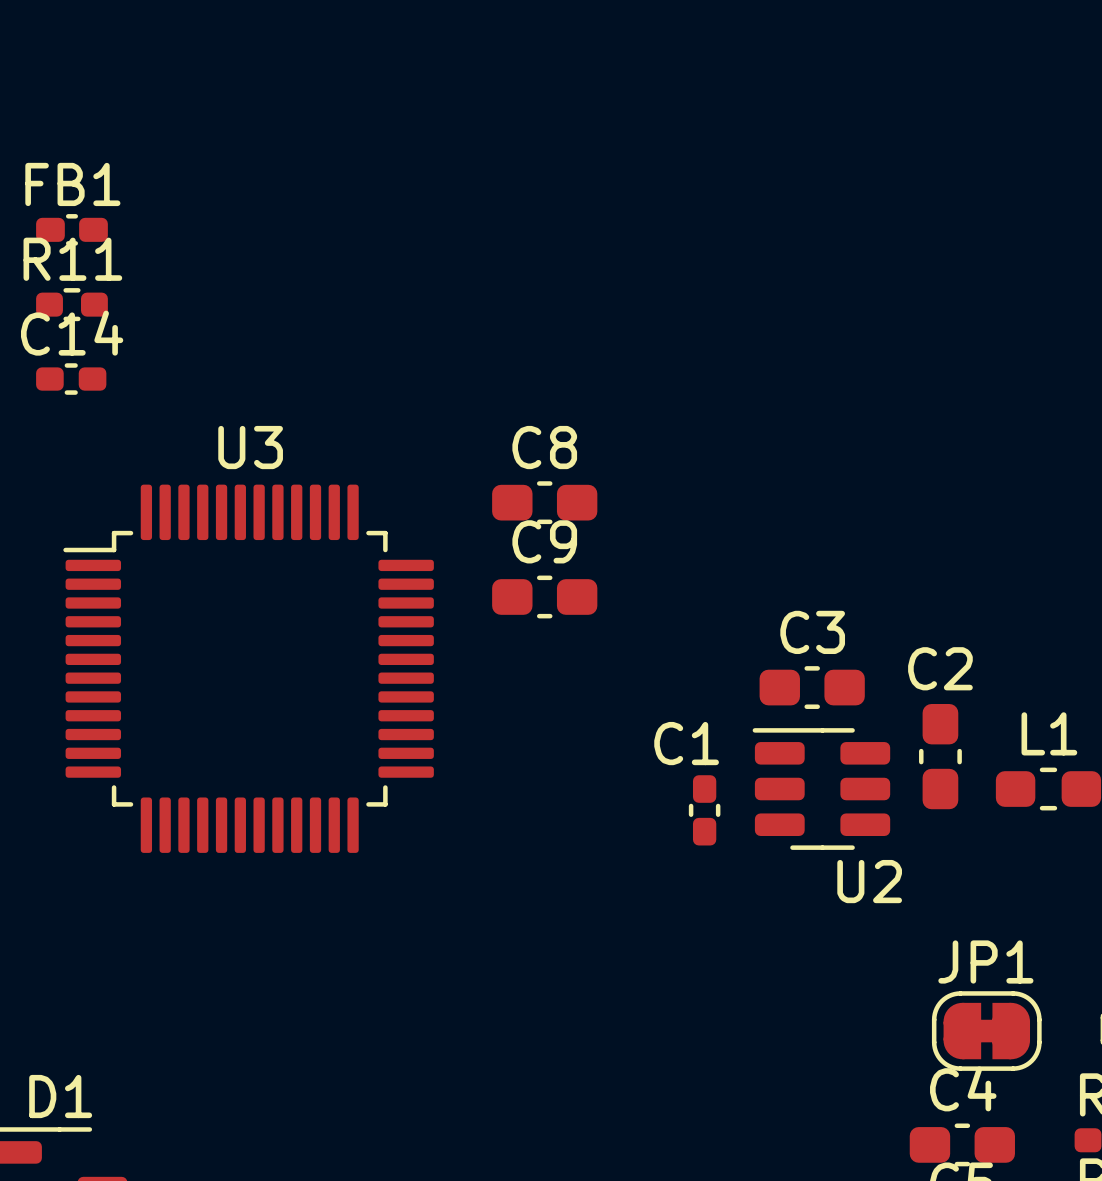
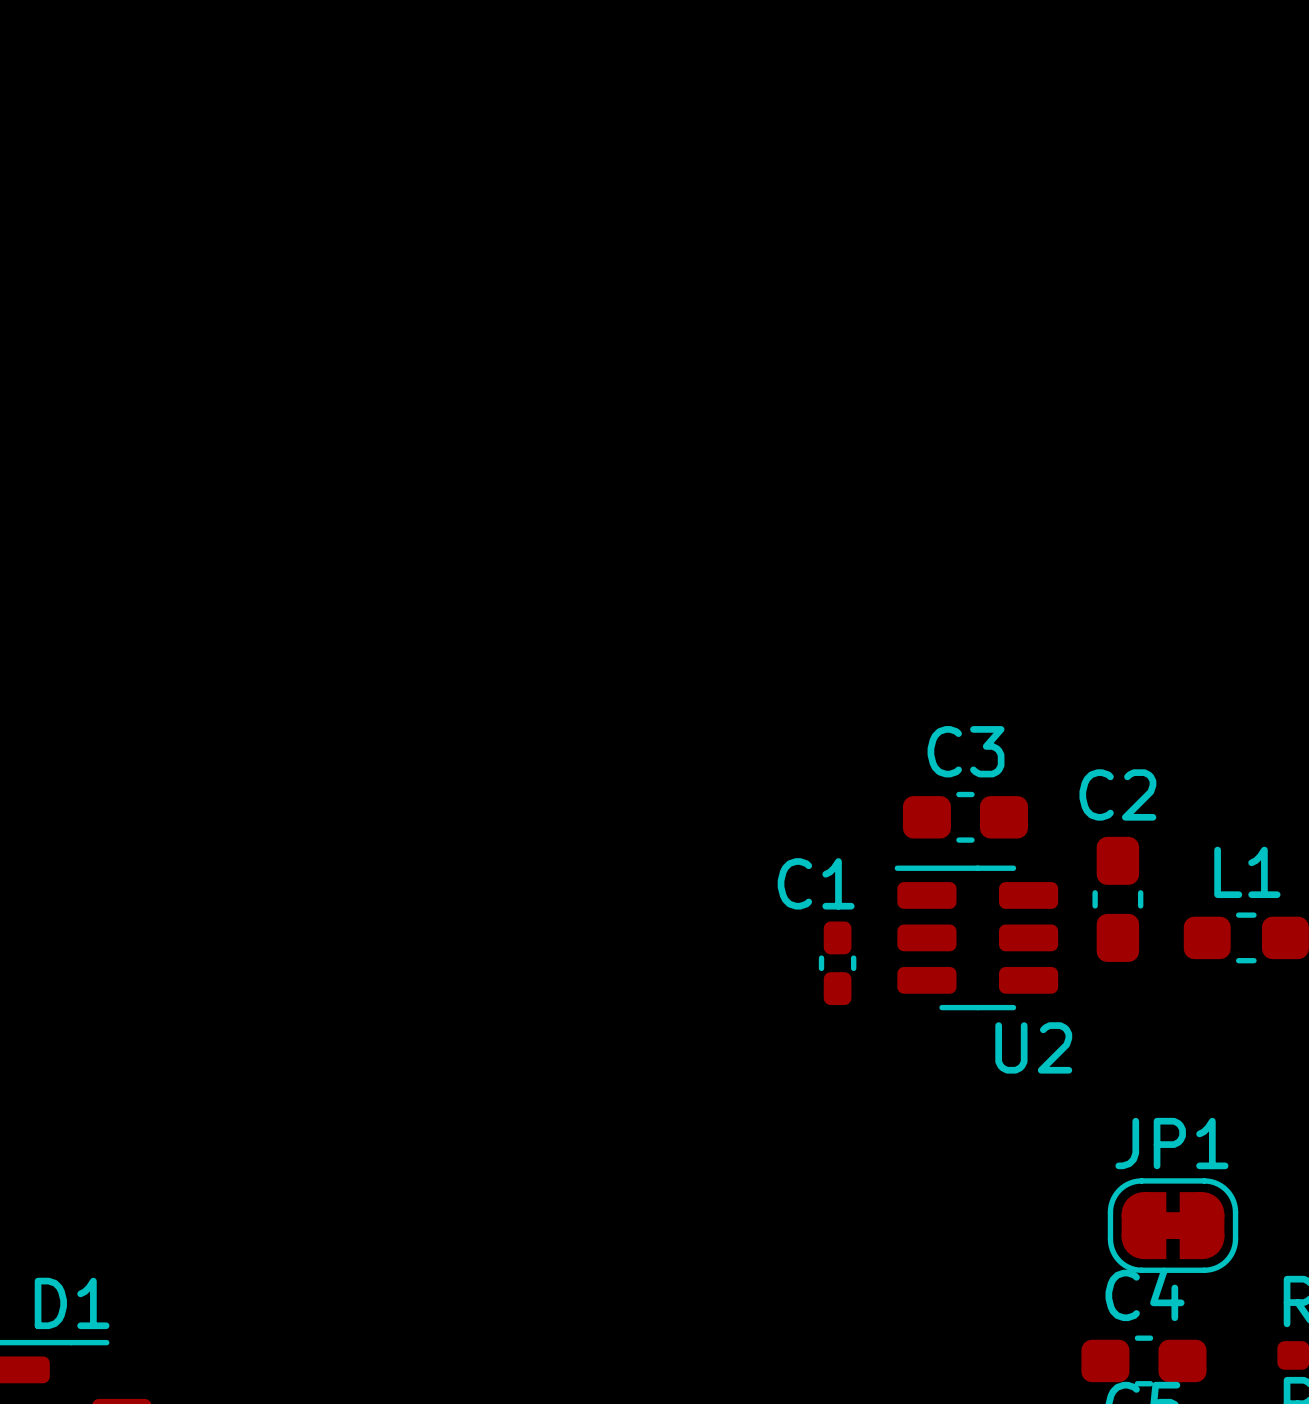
FB1: (71, 229) -> none
R11: (71, 304) -> none
C14: (71, 379) -> none
C8: (544, 502) -> none
C9: (544, 596) -> none
U3: (248, 668) -> none

